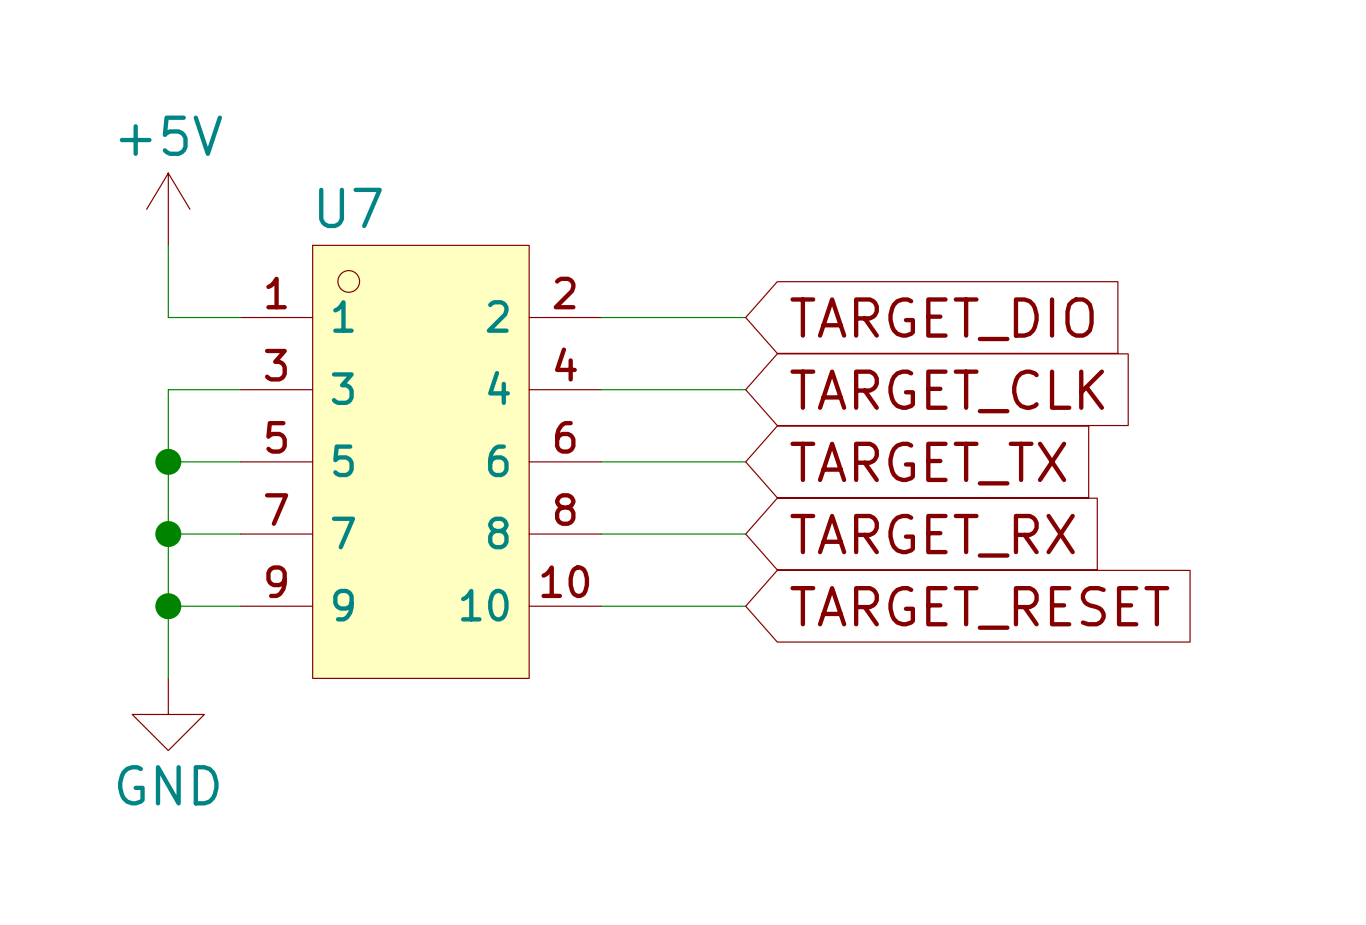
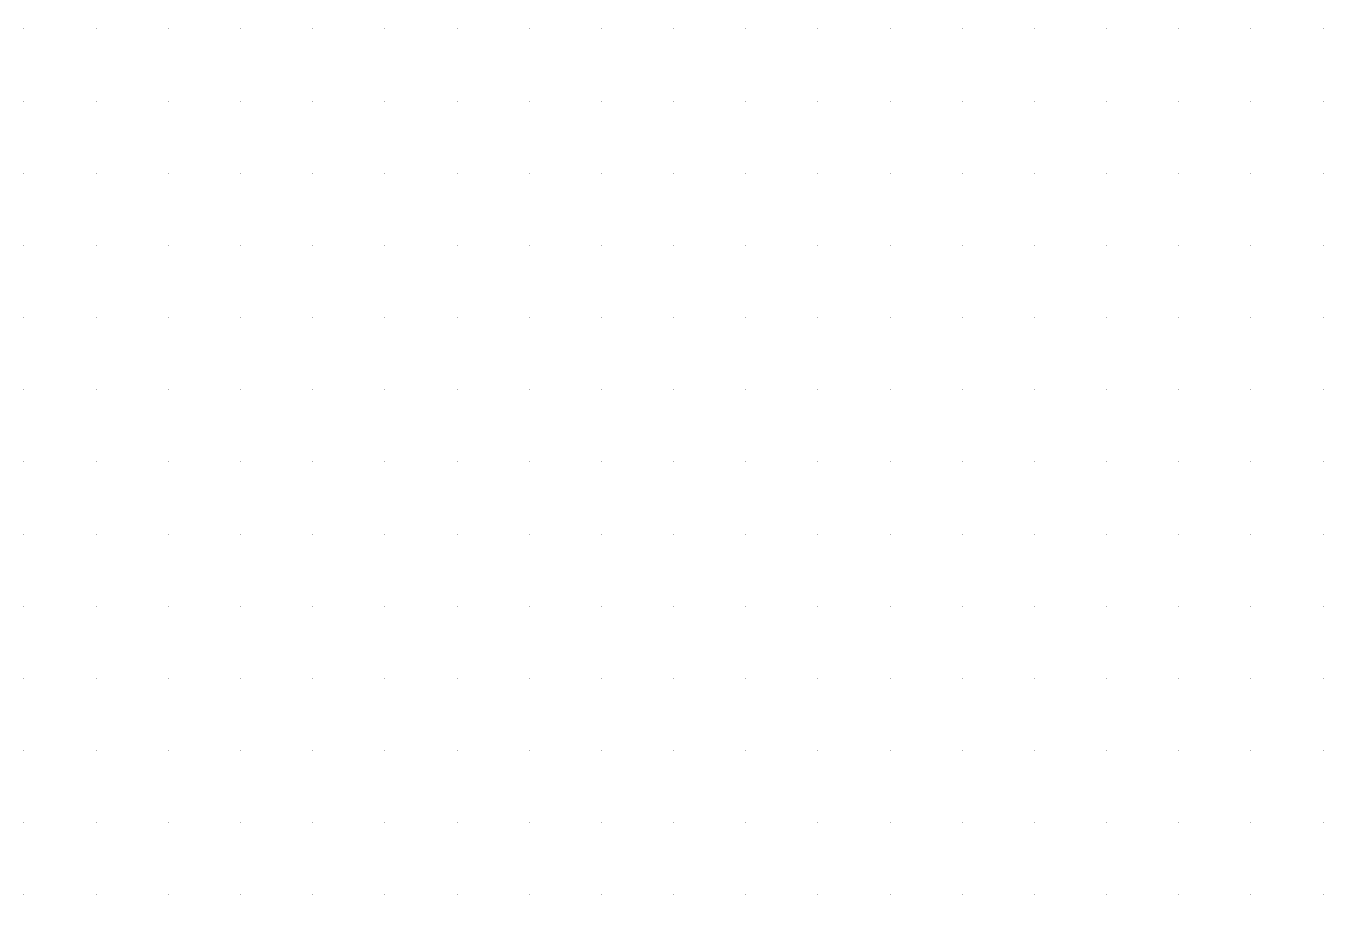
power symbol: +5V (168, 209) -> none
wire: (168, 245) (168, 317) (240, 317) -> none
wire: (601, 317) (745, 317) -> none
global label: TARGET_DIO (942, 319) -> none
wire: (240, 389) (168, 389) (168, 678) -> none
wire: (601, 389) (745, 389) -> none
global label: TARGET_CLK (947, 391) -> none
wire: (168, 461) (240, 461) -> none
junction: (168, 461) -> none
U7: (420, 461) -> none
wire: (601, 461) (745, 461) -> none
global label: TARGET_TX (928, 463) -> none
wire: (168, 534) (240, 534) -> none
junction: (168, 534) -> none
wire: (601, 534) (745, 534) -> none
global label: TARGET_RX (932, 535) -> none
wire: (168, 606) (240, 606) -> none
junction: (168, 606) -> none
wire: (601, 606) (745, 606) -> none
global label: TARGET_RESET (979, 607) -> none
power symbol: GND (168, 714) -> none

